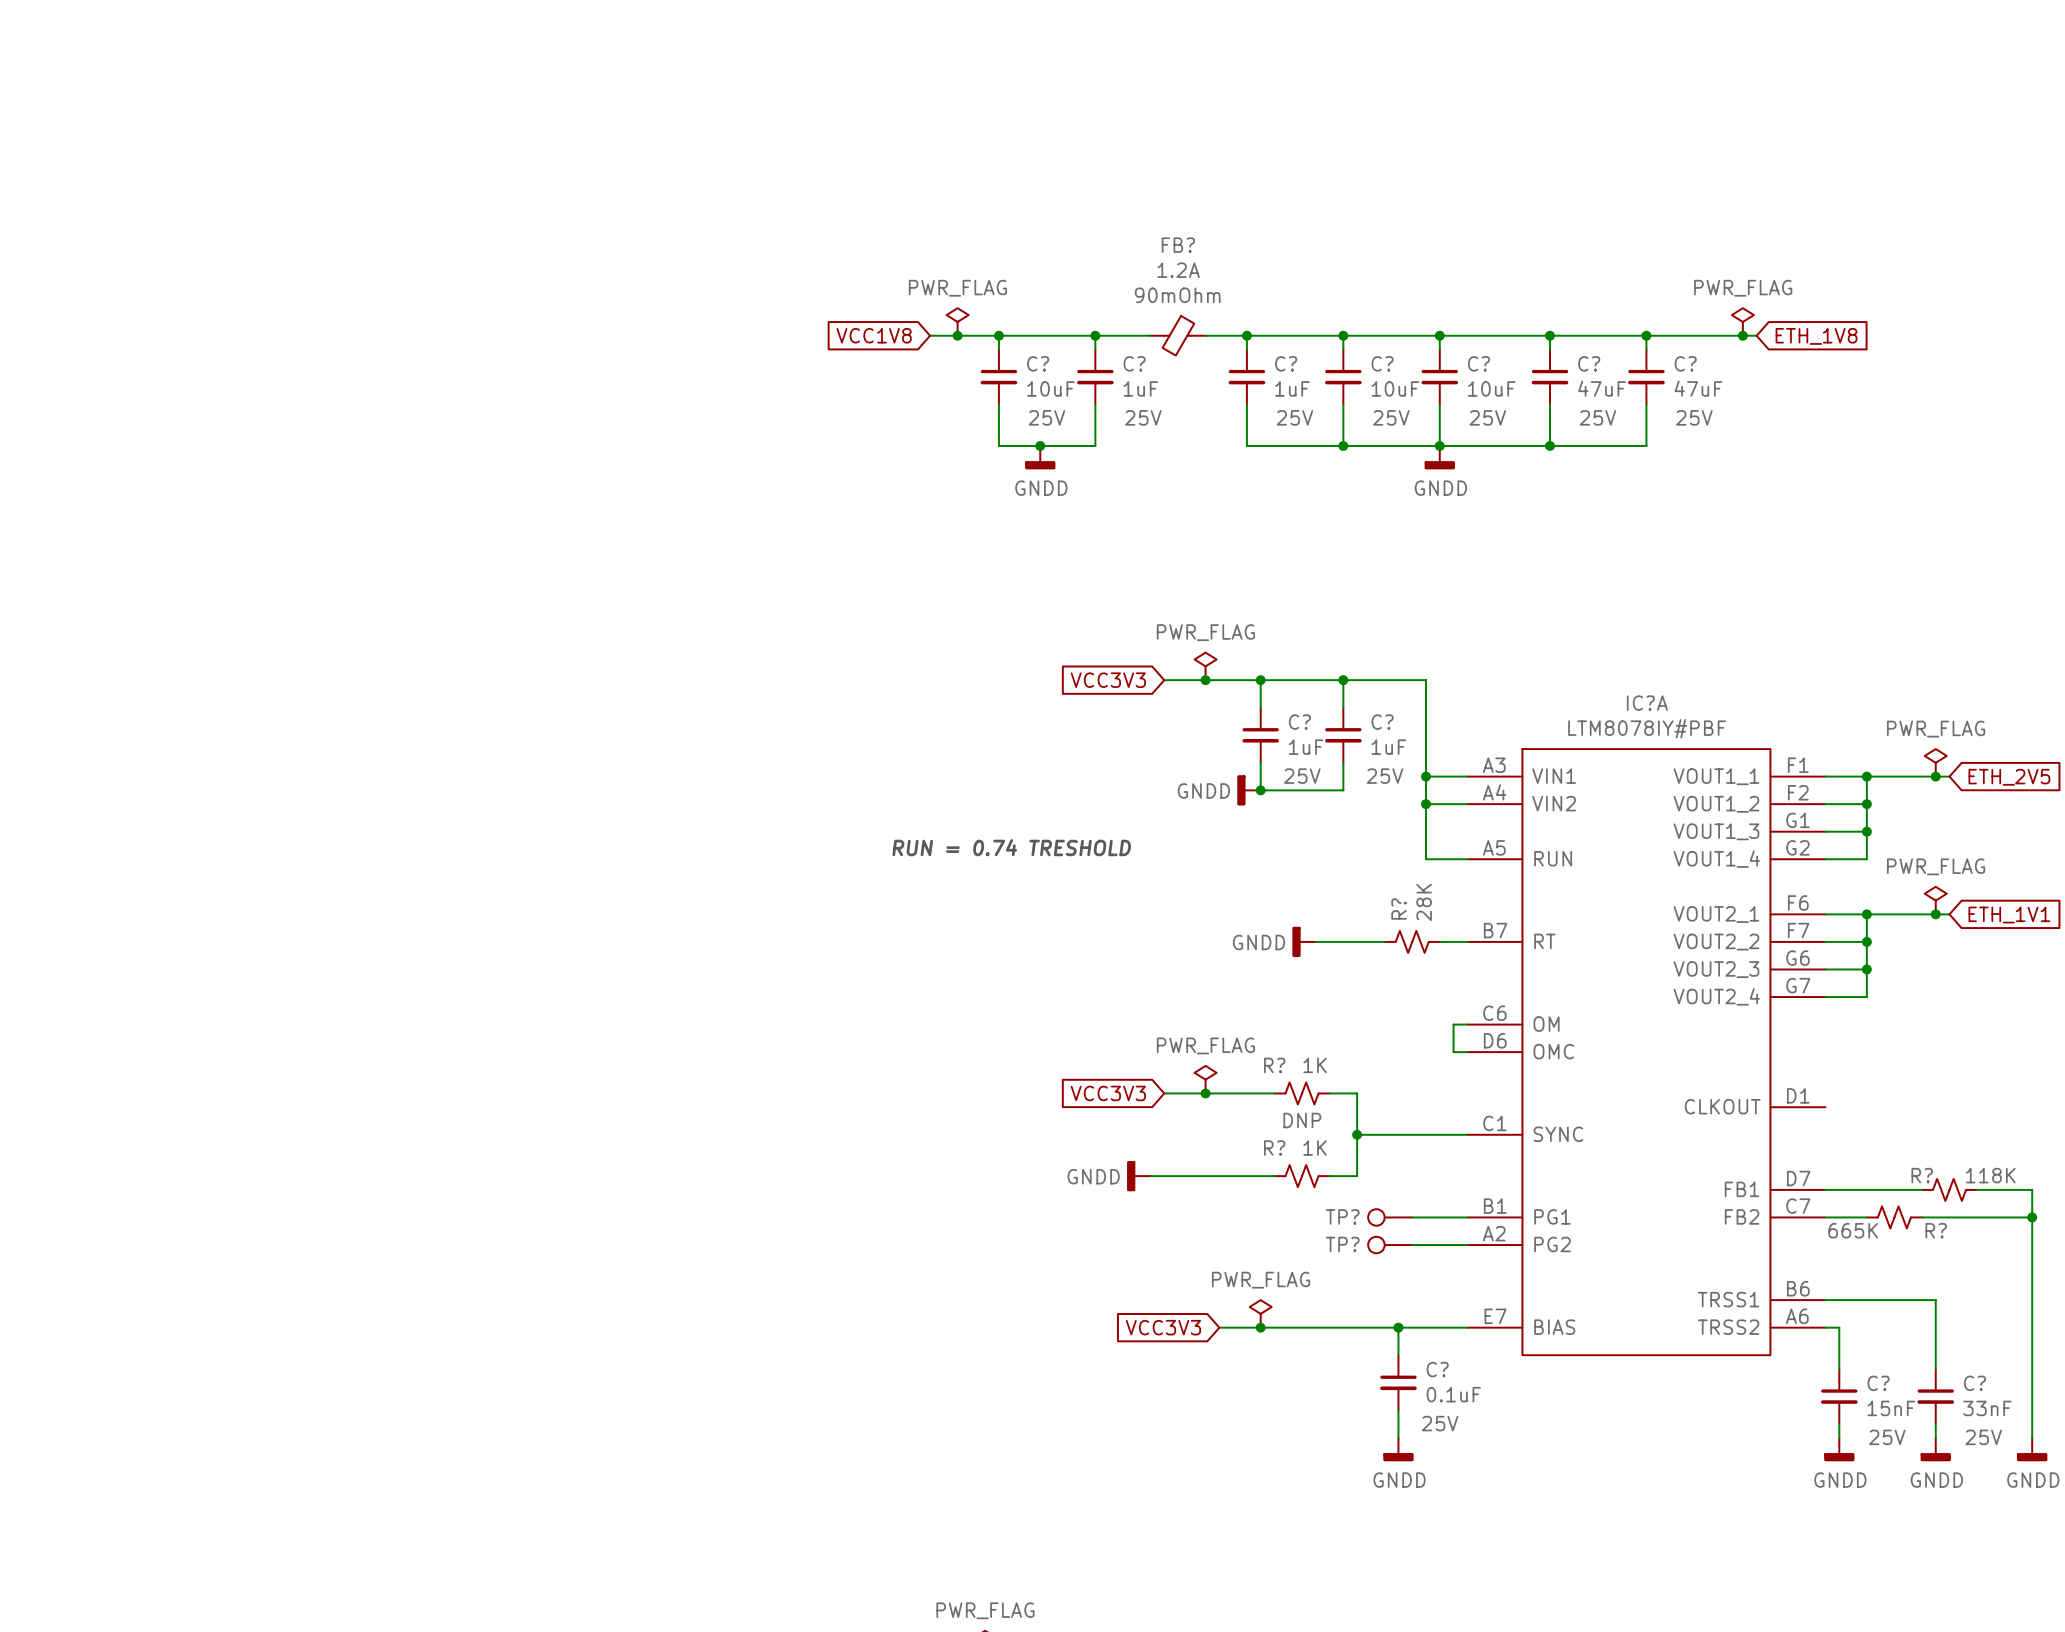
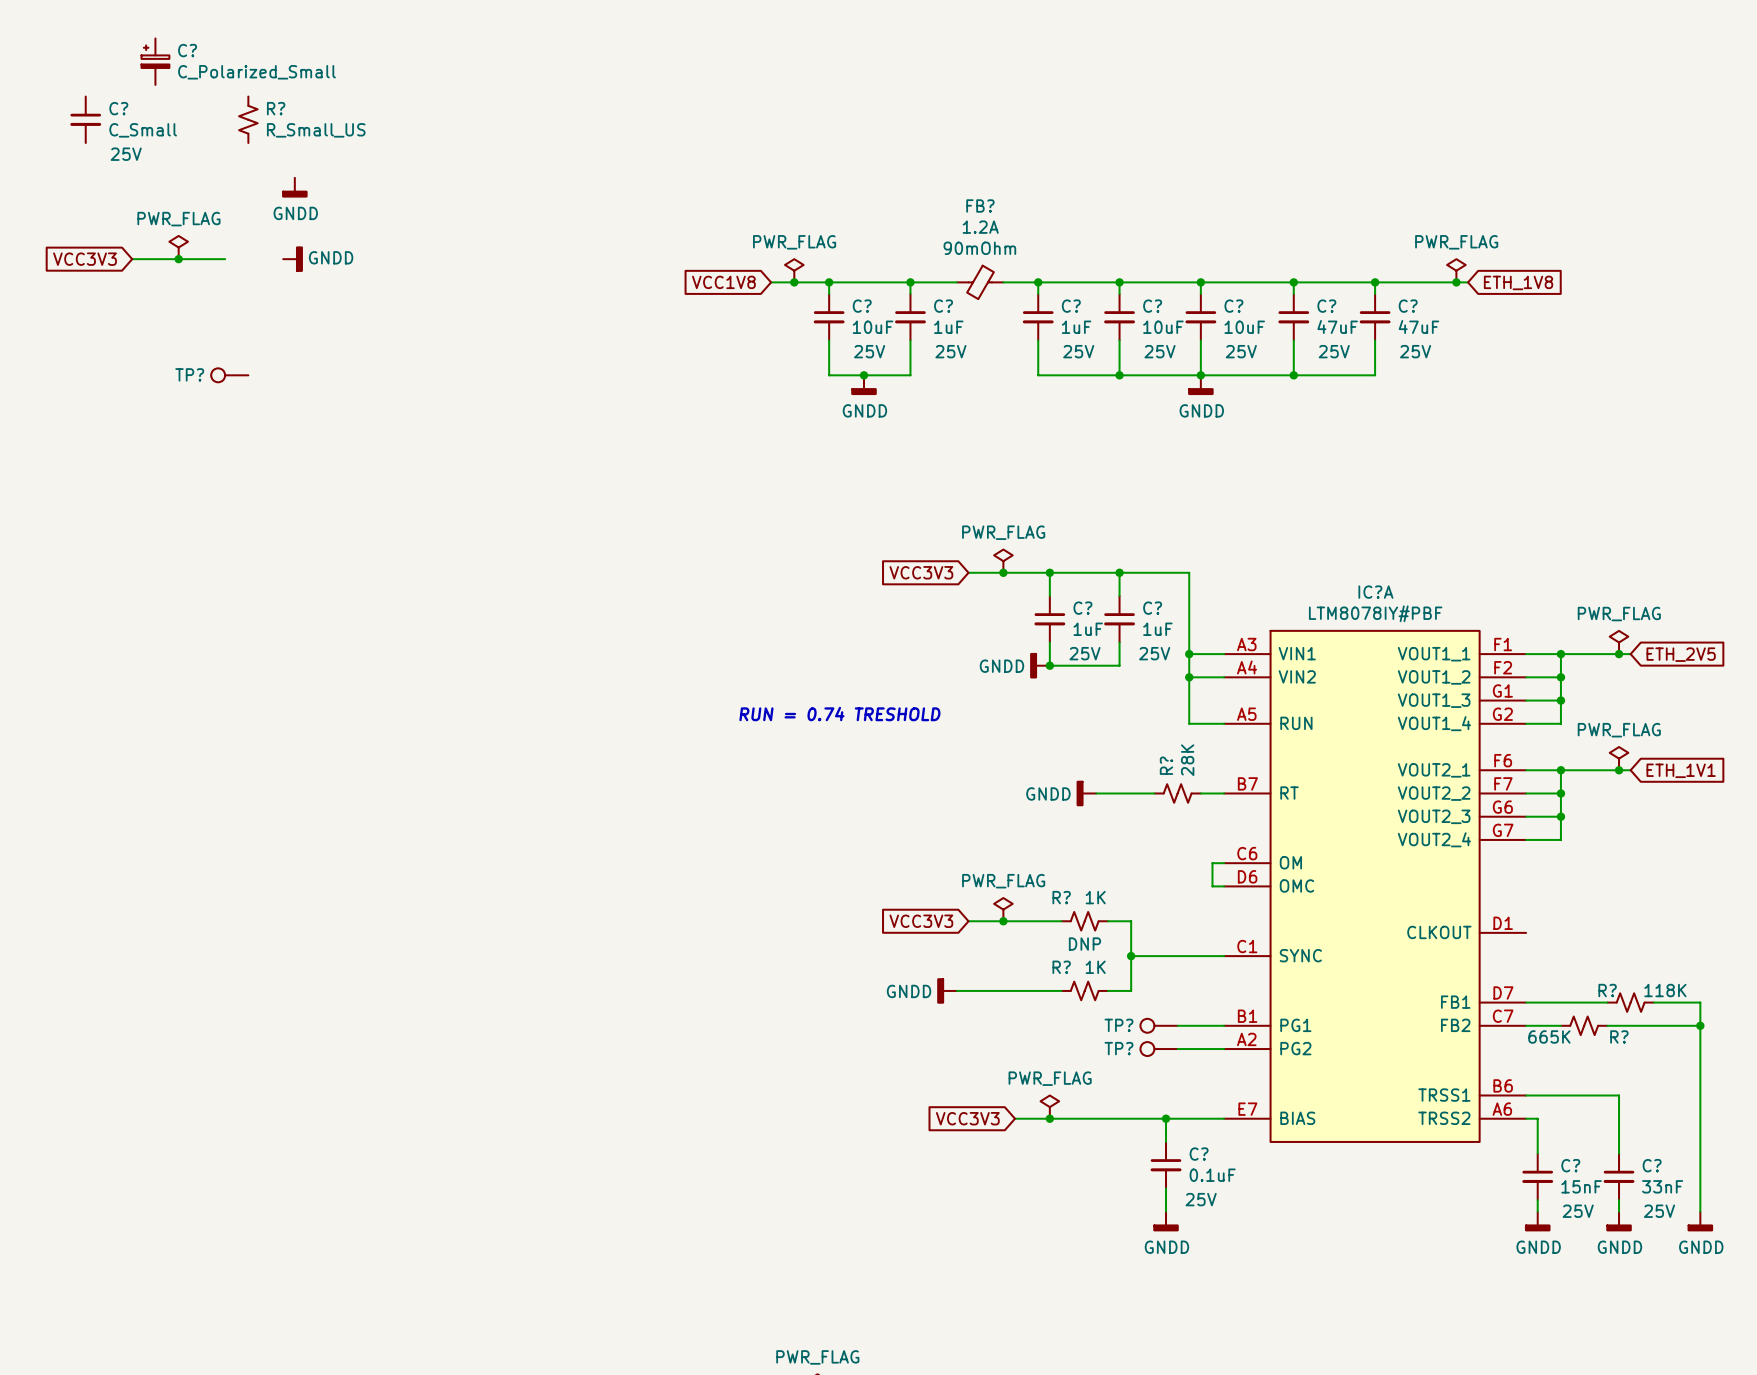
C?: none -> C_Polarized_Small (155, 61)
C?: none -> C_Small (85, 119)
R?: none -> R_Small_US (248, 119)
power symbol: none -> GNDD (294, 187)
power symbol: none -> PWR_FLAG (178, 247)
global label: none -> VCC3V3 (85, 259)
wire: none -> (132, 259) (225, 259)
junction: none -> (178, 259)
power symbol: none -> GNDD (293, 259)
TP?: none -> (229, 375)

